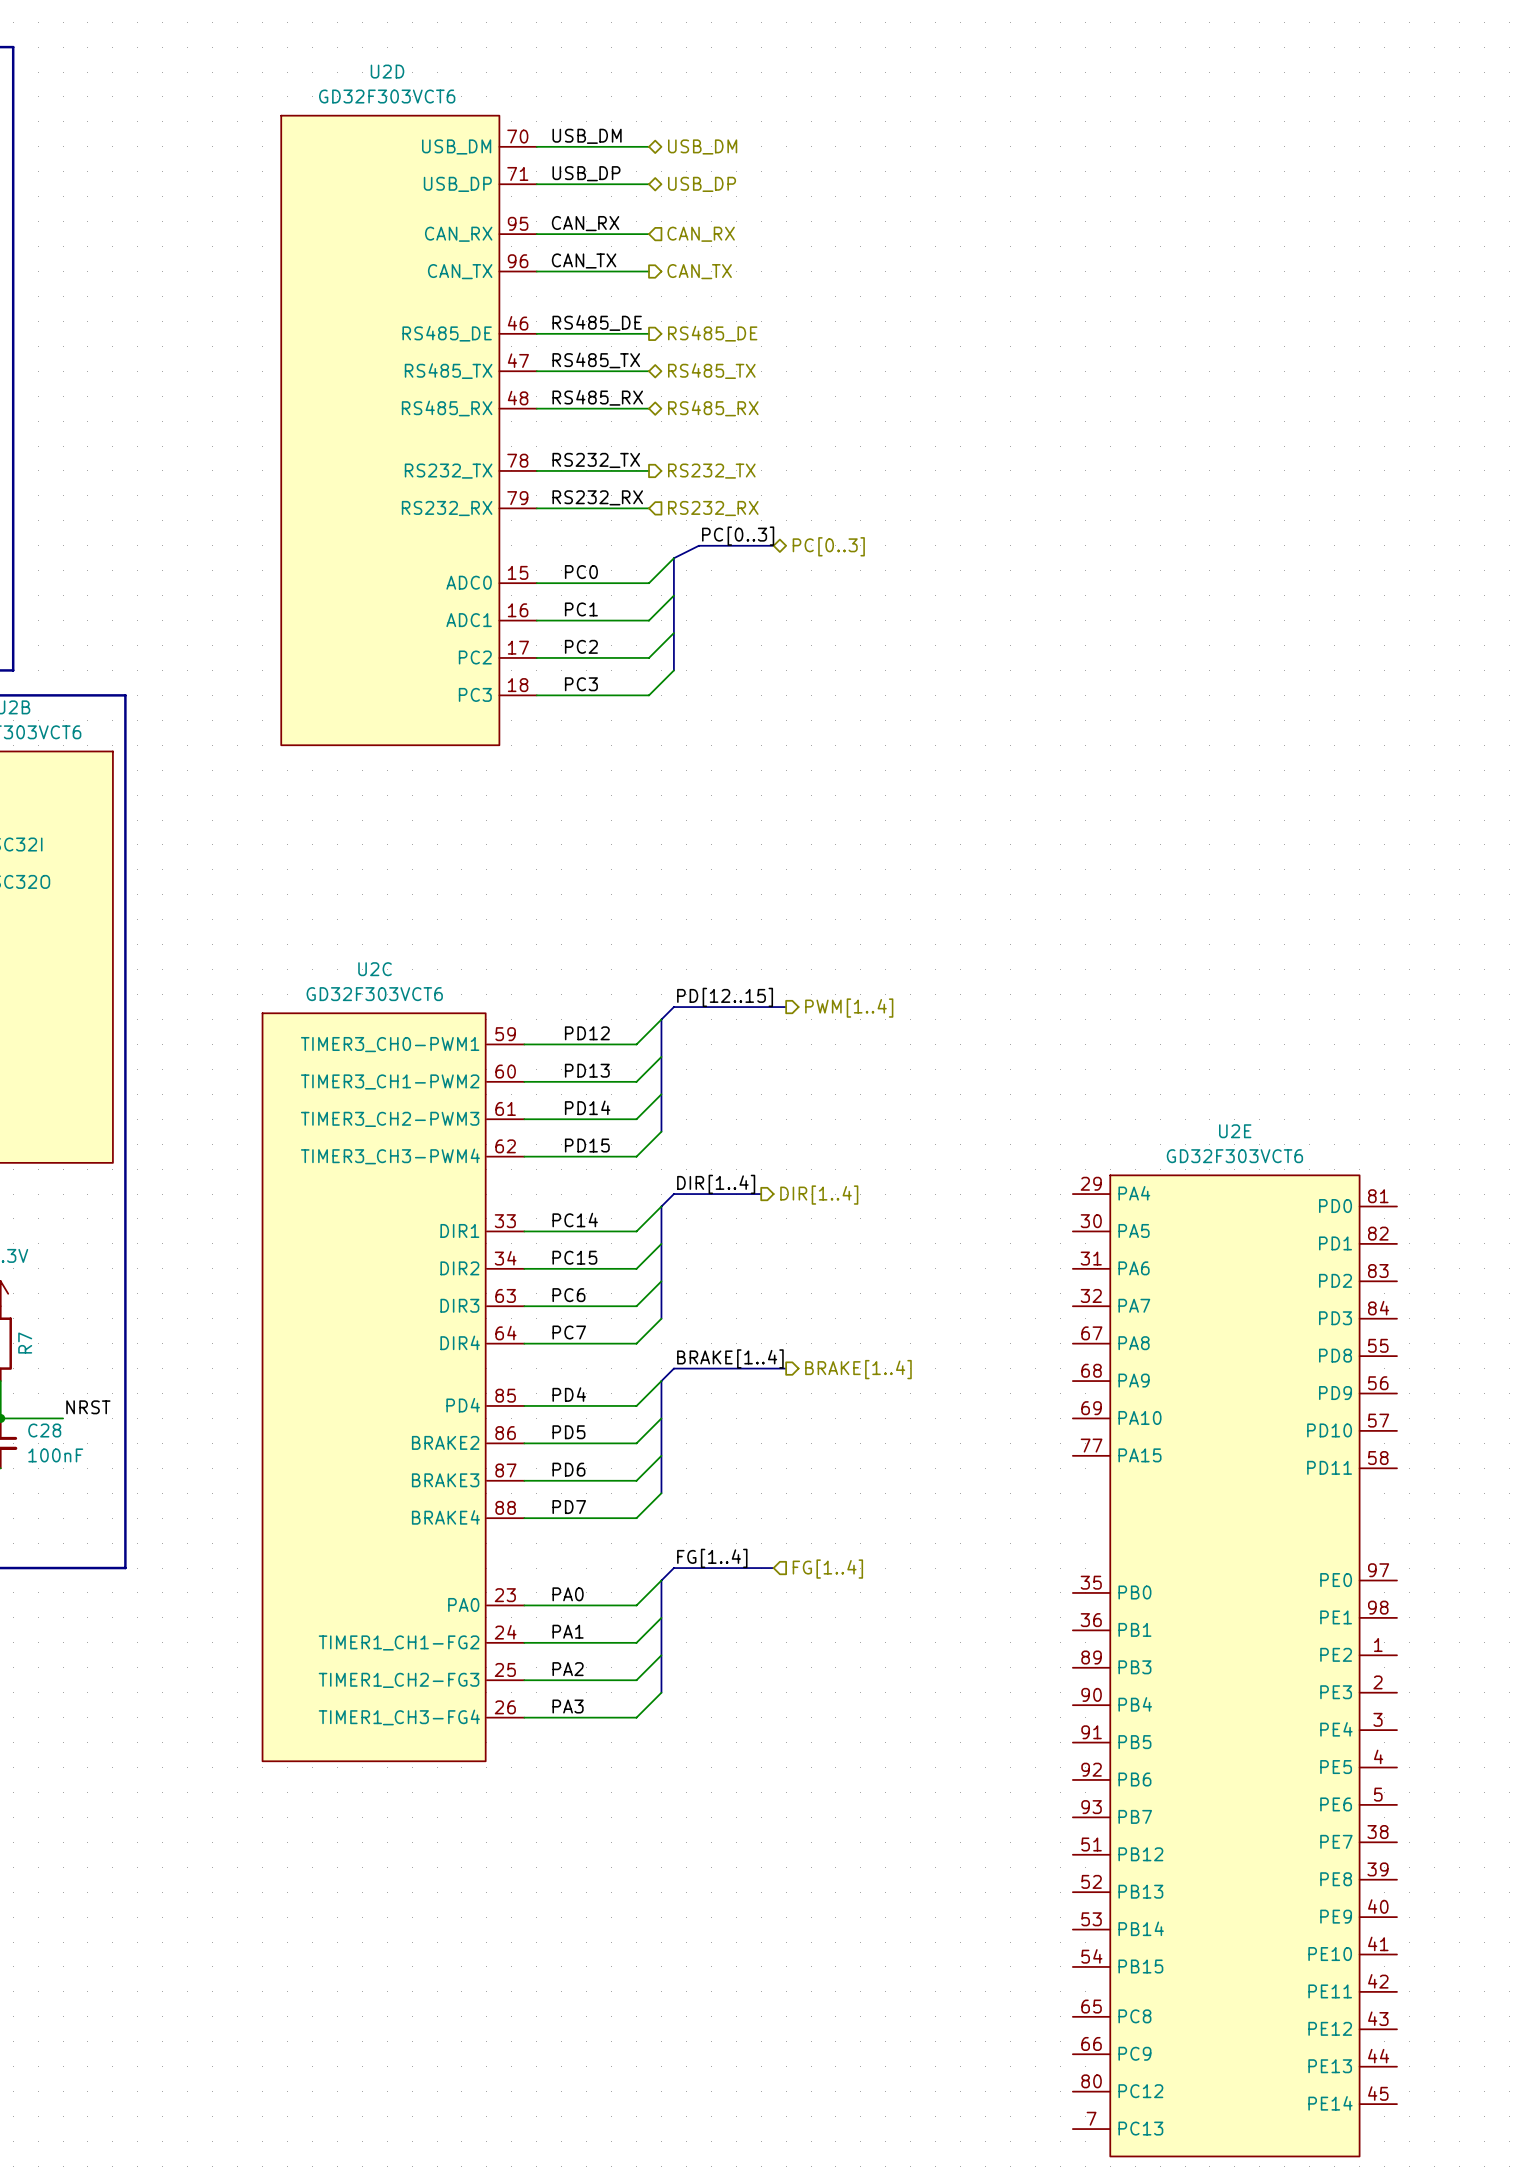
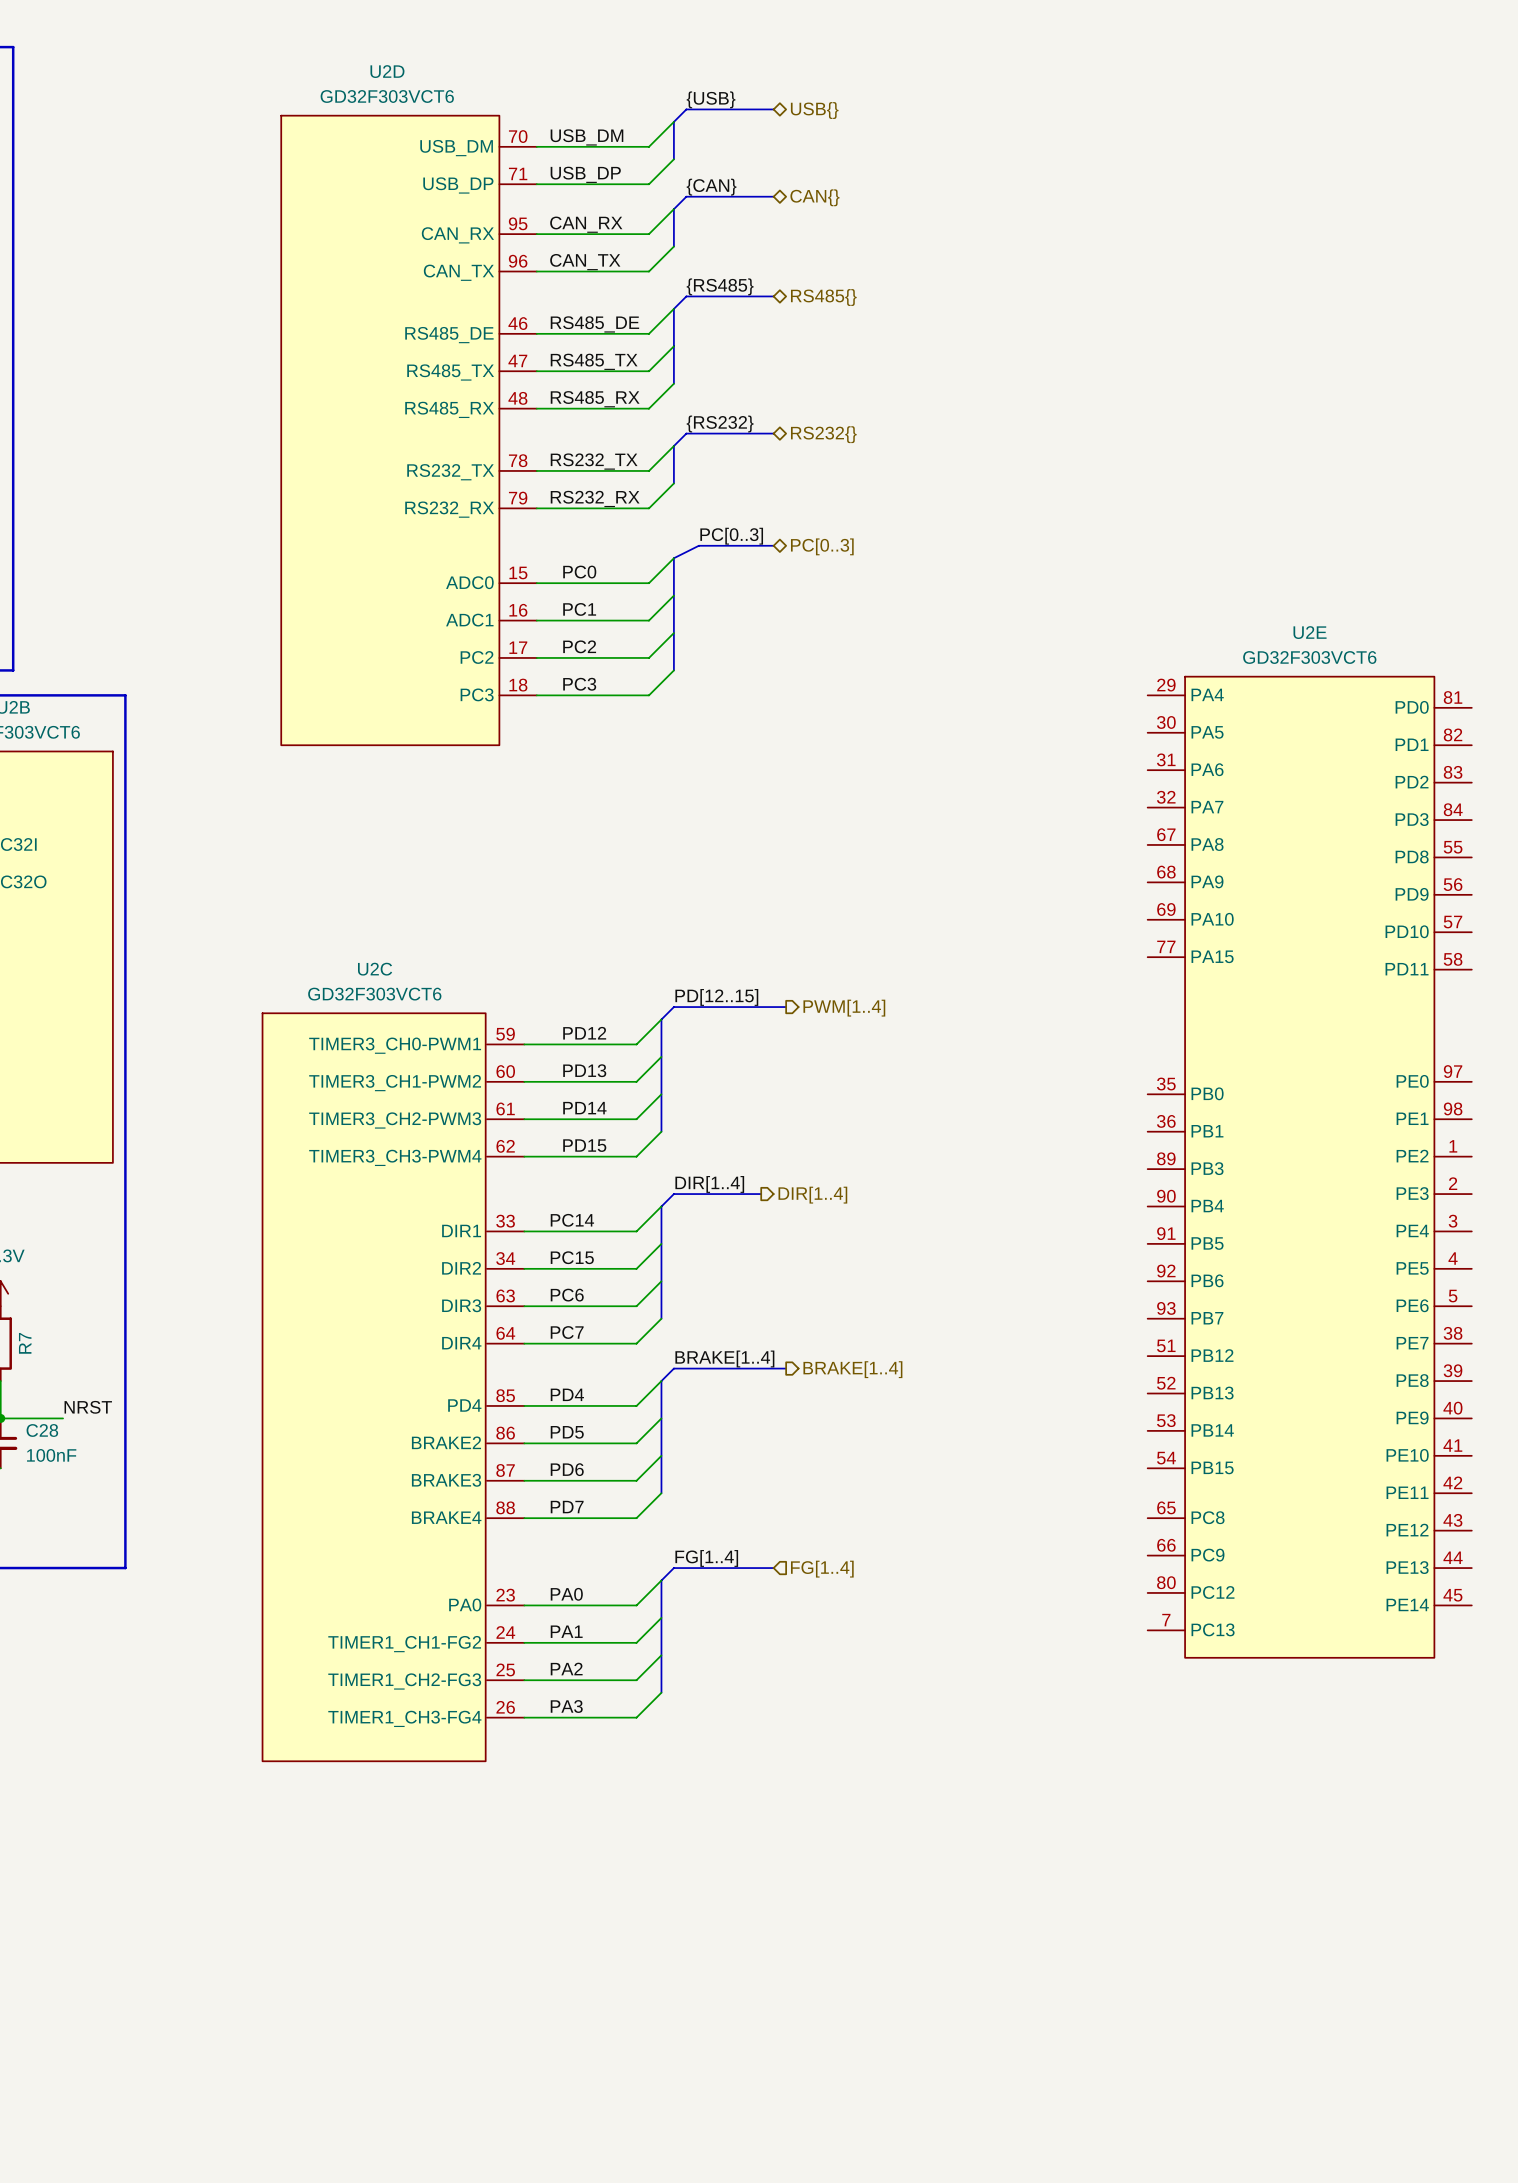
label: none -> {USB} (711, 99)
bus: none -> (773, 109) (686, 109) (673, 121) (673, 159)
hierarchical label: none -> USB{} (814, 110)
wire: none -> (673, 121) (648, 146)
hierarchical label: USB_DM (702, 146) -> none
wire: none -> (673, 159) (648, 184)
hierarchical label: USB_DP (702, 184) -> none
label: none -> {CAN} (711, 187)
bus: none -> (773, 196) (686, 196) (673, 209) (673, 246)
hierarchical label: none -> CAN{} (814, 197)
wire: none -> (673, 209) (648, 234)
hierarchical label: CAN_RX (701, 234) -> none
wire: none -> (673, 246) (648, 271)
hierarchical label: CAN_TX (699, 271) -> none
label: none -> {RS485} (720, 286)
bus: none -> (773, 296) (686, 296) (673, 308) (673, 383)
hierarchical label: none -> RS485{} (823, 297)
wire: none -> (673, 308) (648, 333)
hierarchical label: RS485_DE (712, 333) -> none
wire: none -> (673, 346) (648, 371)
hierarchical label: RS485_TX (711, 371) -> none
wire: none -> (673, 383) (648, 408)
hierarchical label: RS485_RX (713, 408) -> none
label: none -> {RS232} (720, 424)
bus: none -> (773, 433) (686, 433) (673, 446) (673, 483)
hierarchical label: none -> RS232{} (823, 434)
wire: none -> (673, 446) (648, 470)
hierarchical label: RS232_TX (711, 471) -> none
wire: none -> (673, 483) (648, 508)
hierarchical label: RS232_RX (713, 508) -> none
U2E position: (1234, 1665) -> (1309, 1167)

